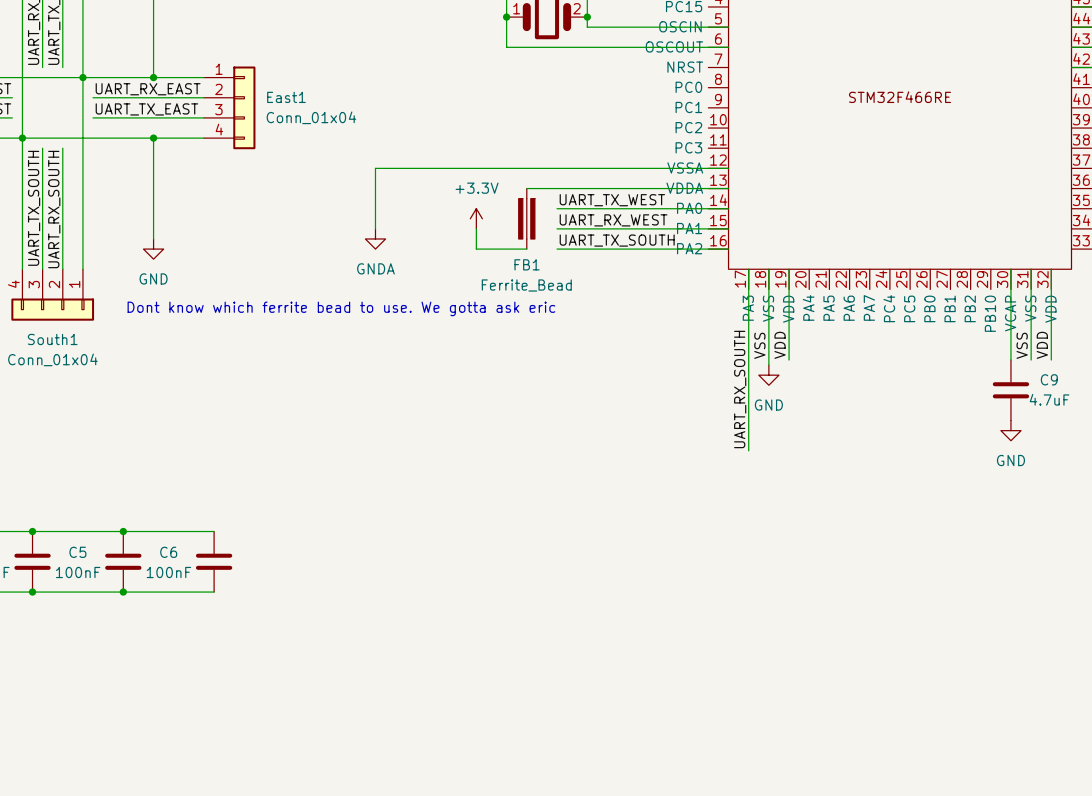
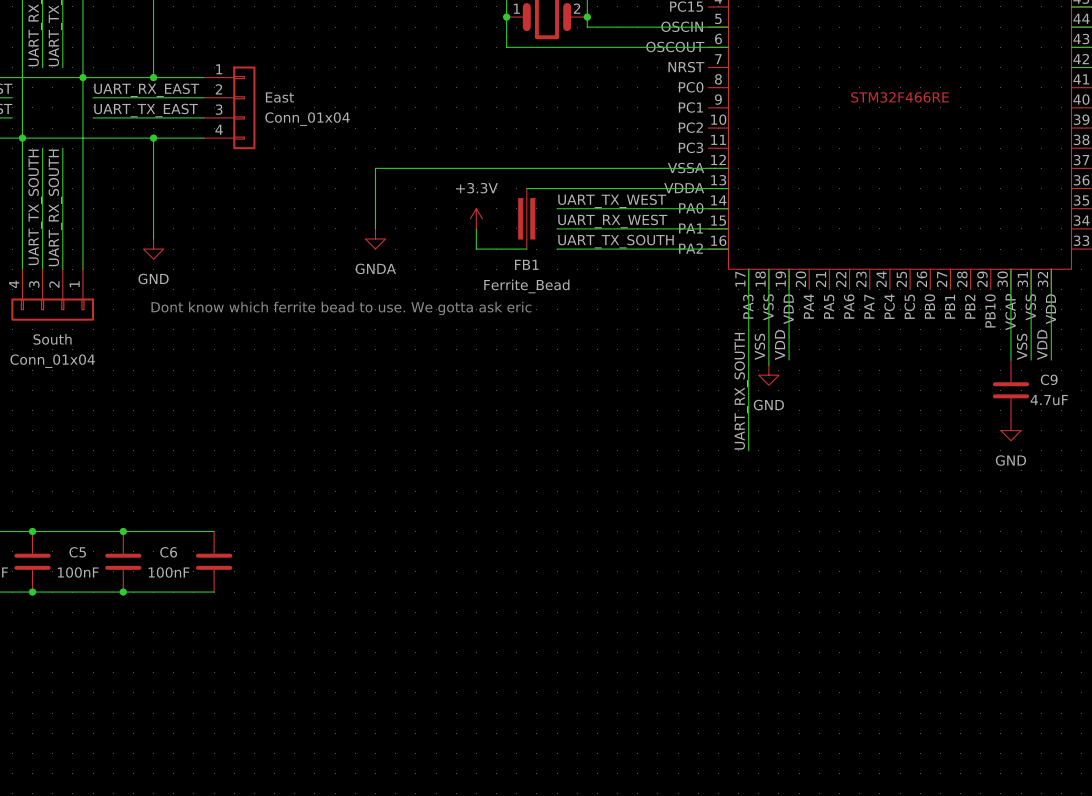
East1 name: East1 (286, 97) -> East (279, 97)
South1 name: South1 (52, 339) -> South (52, 339)

